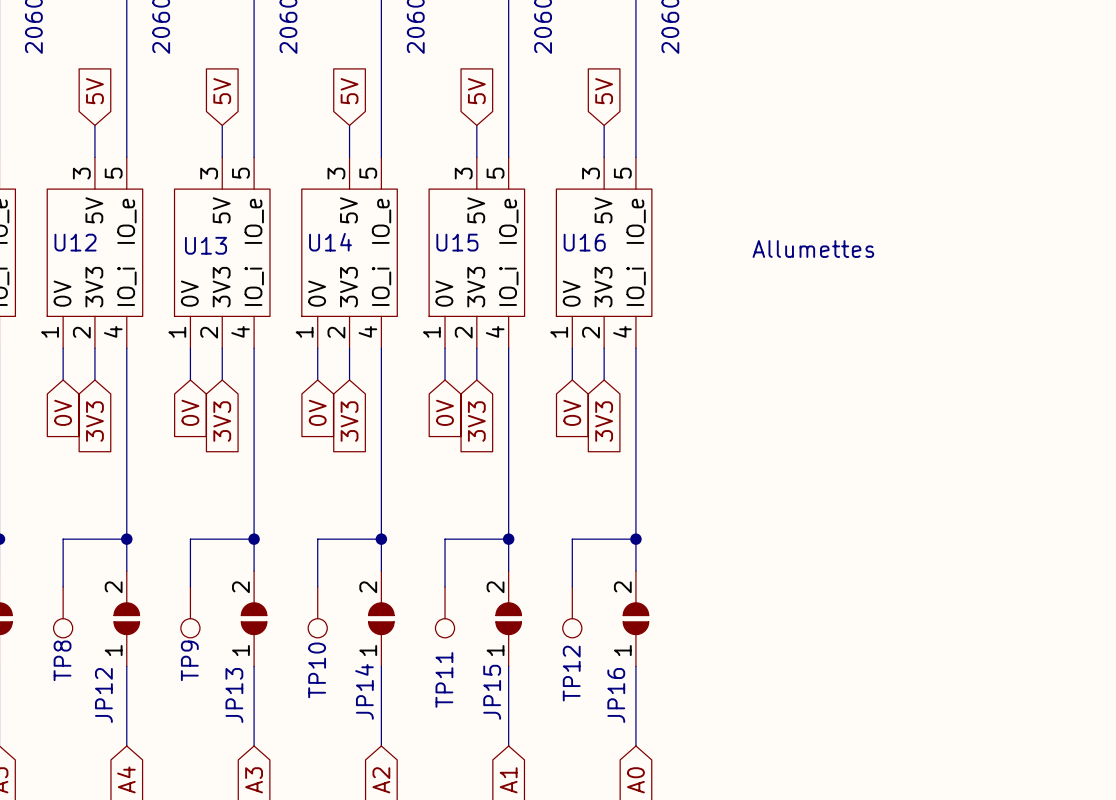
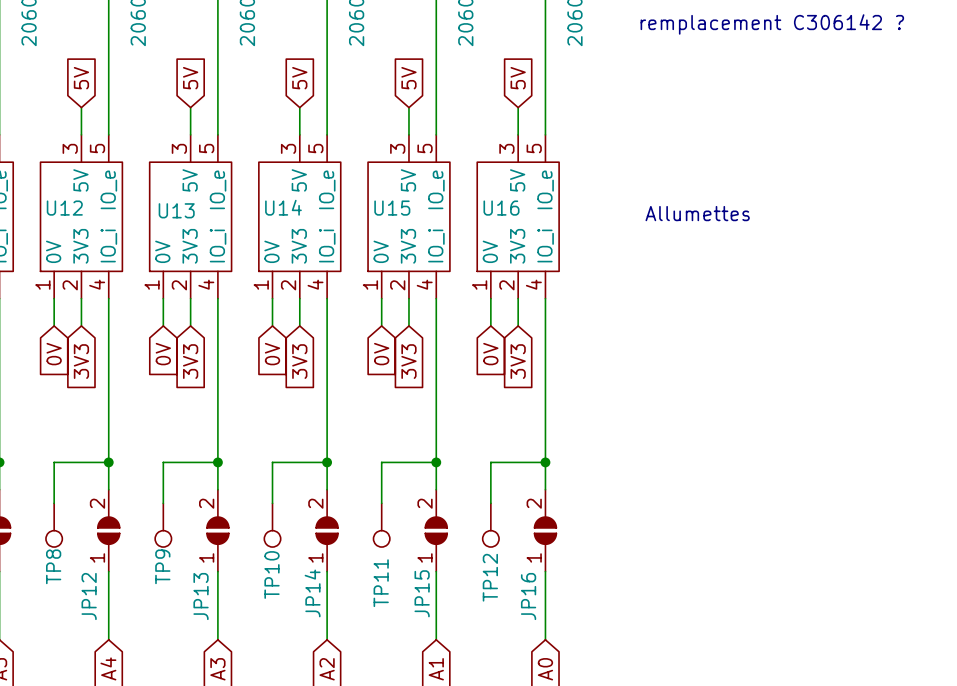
text: none -> remplacement C306142 ? (772, 24)

